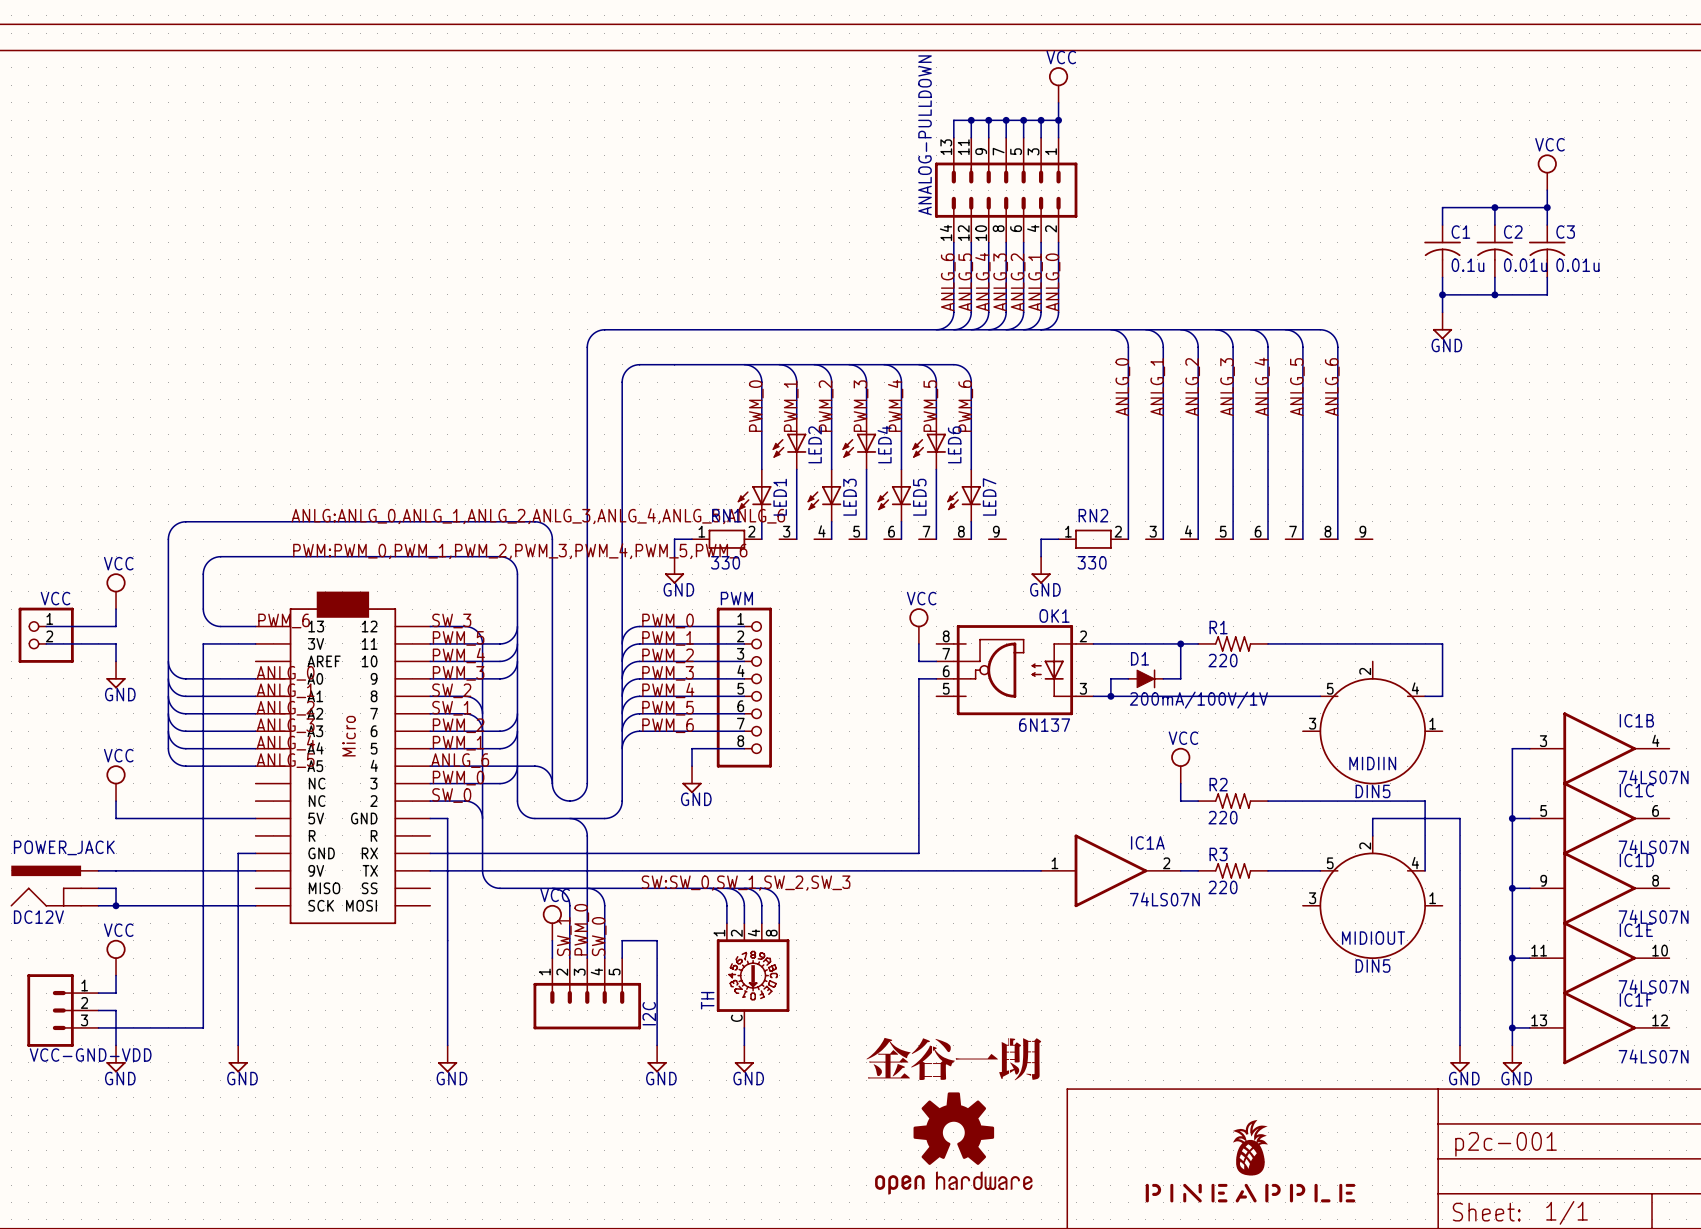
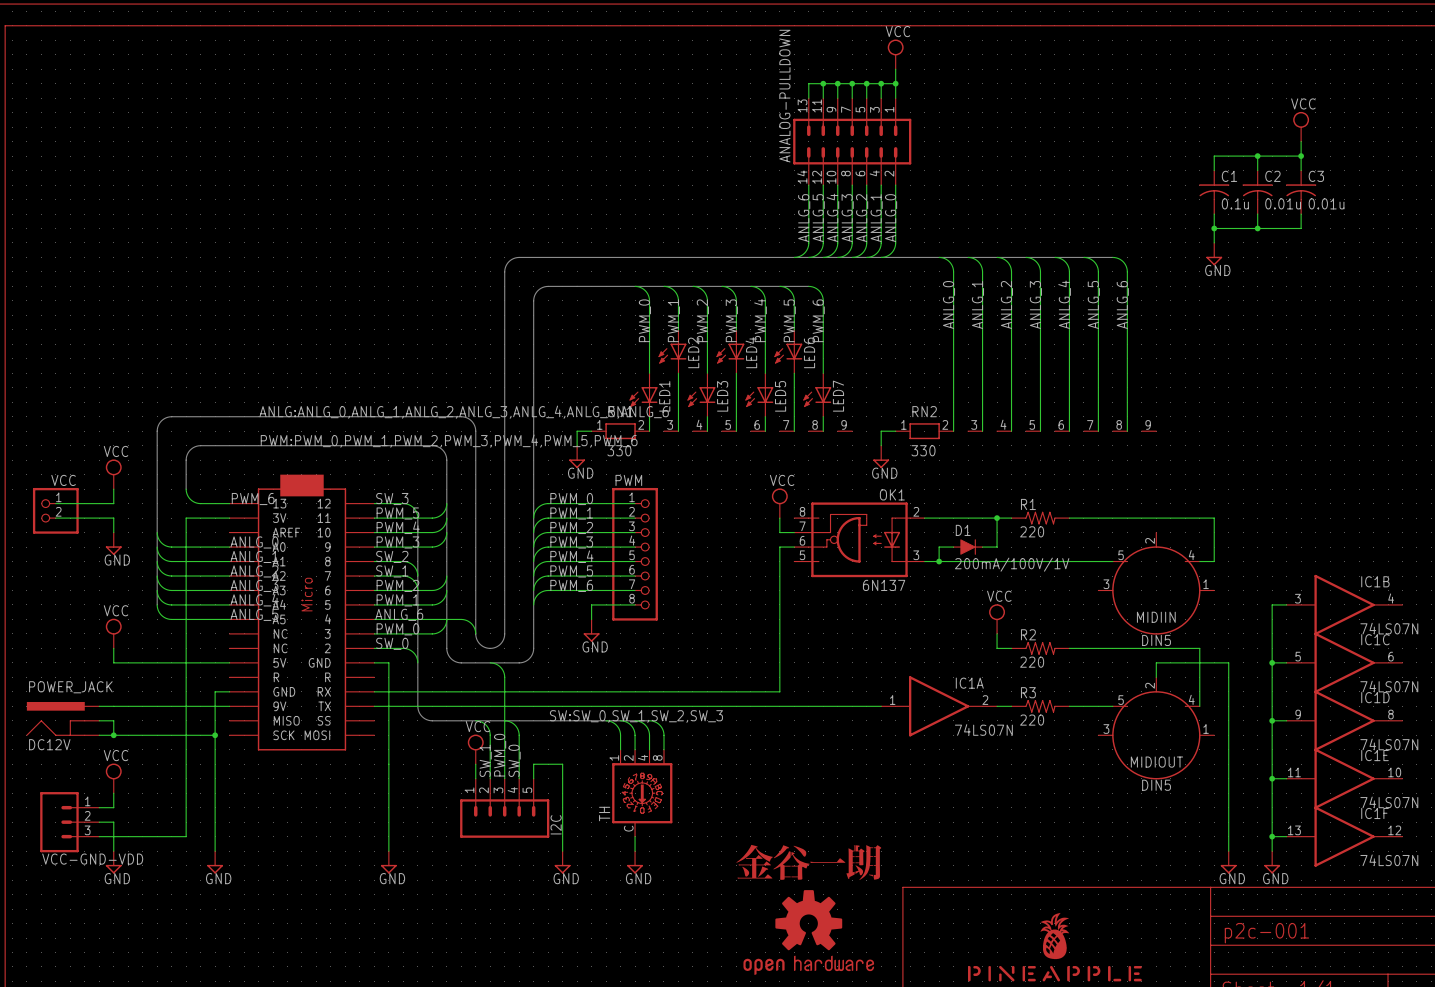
wire: (238, 905) (255, 905) -> none
junction: none -> (215, 735)

